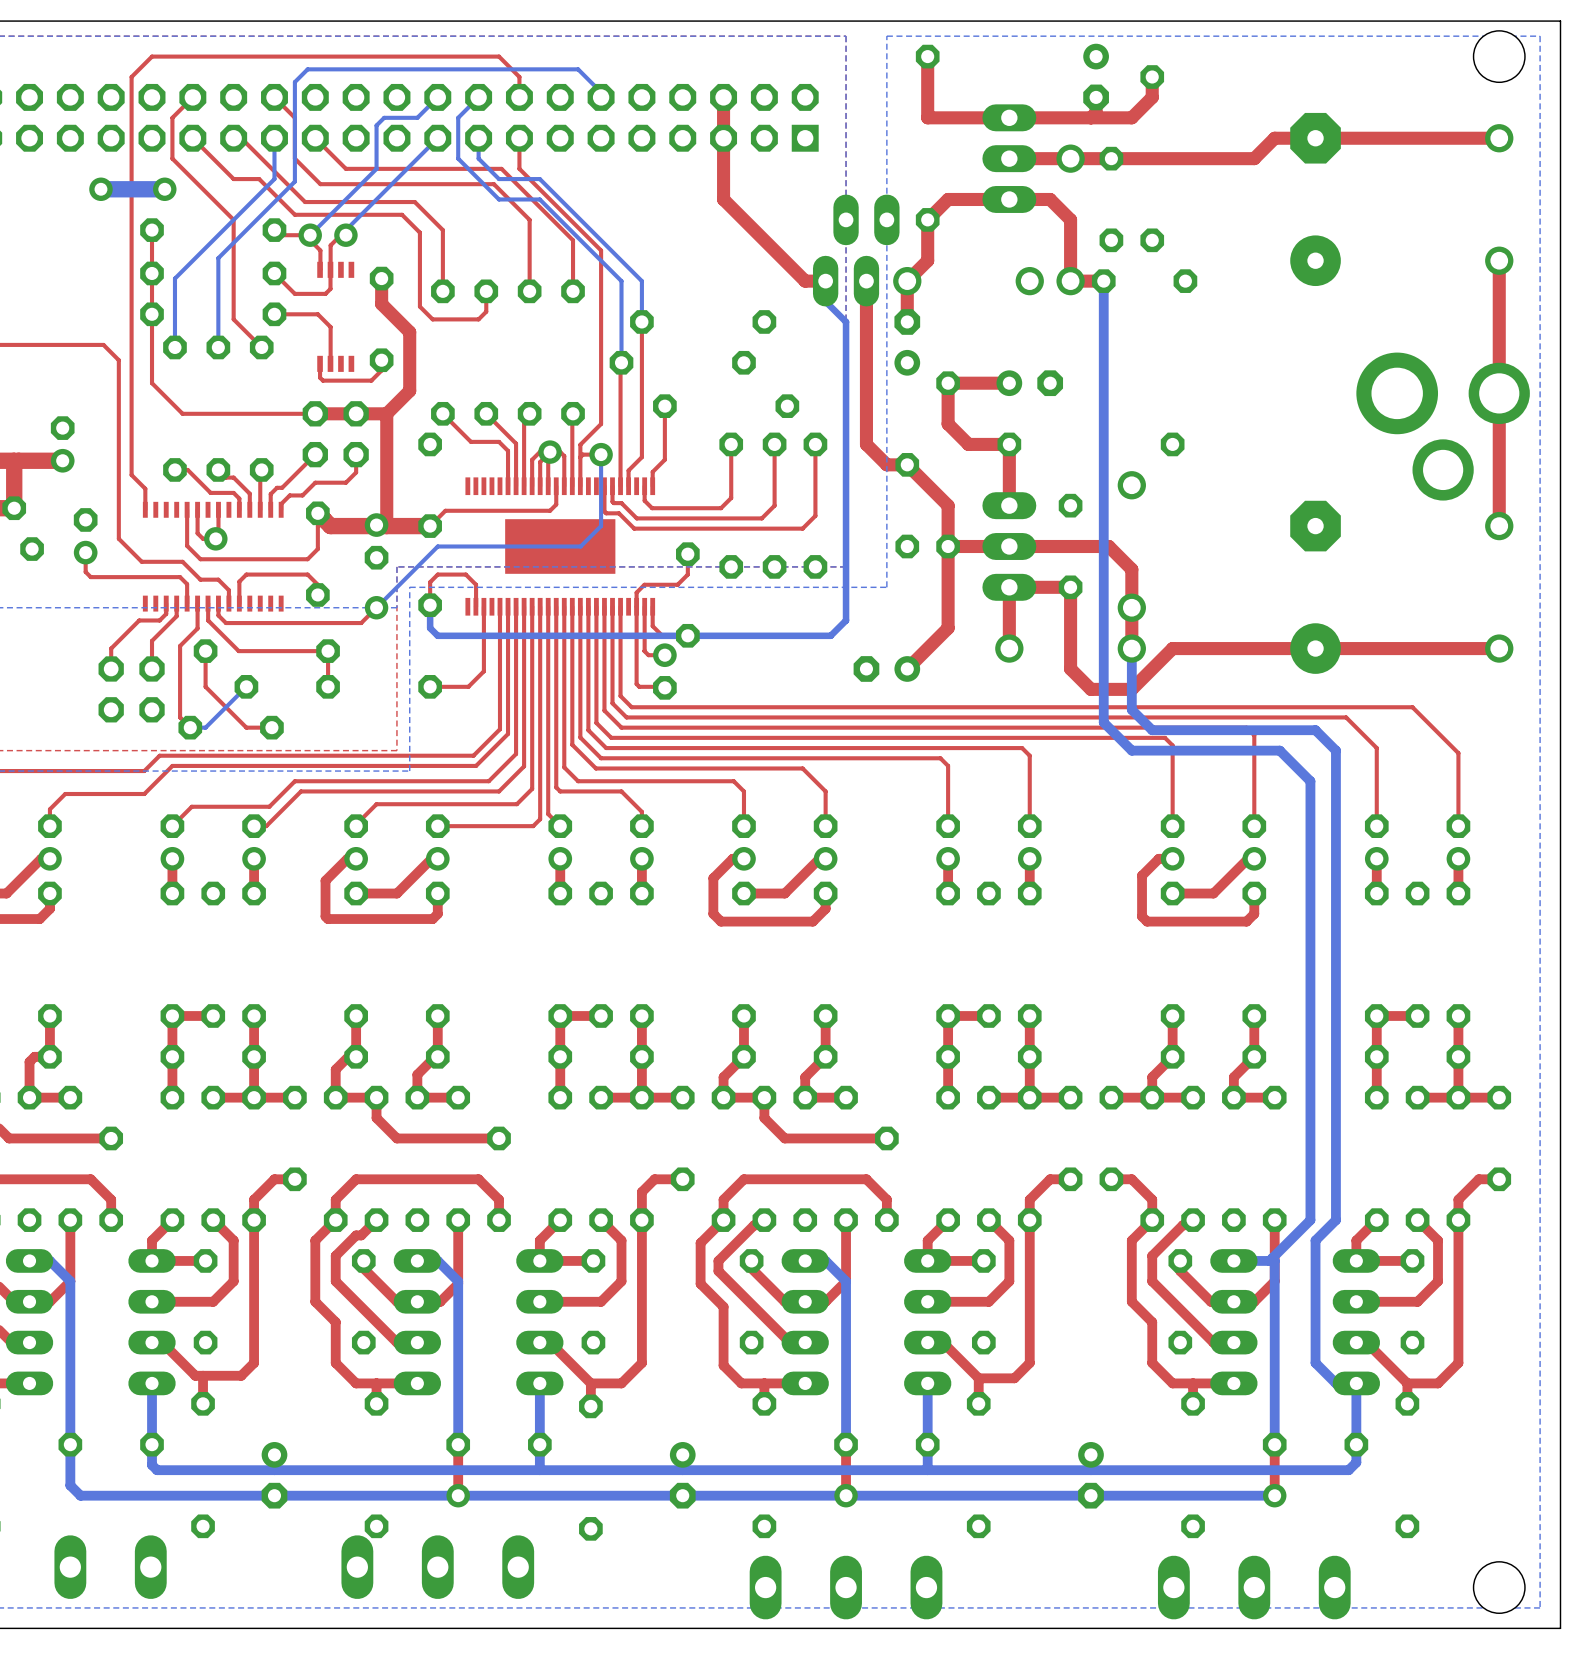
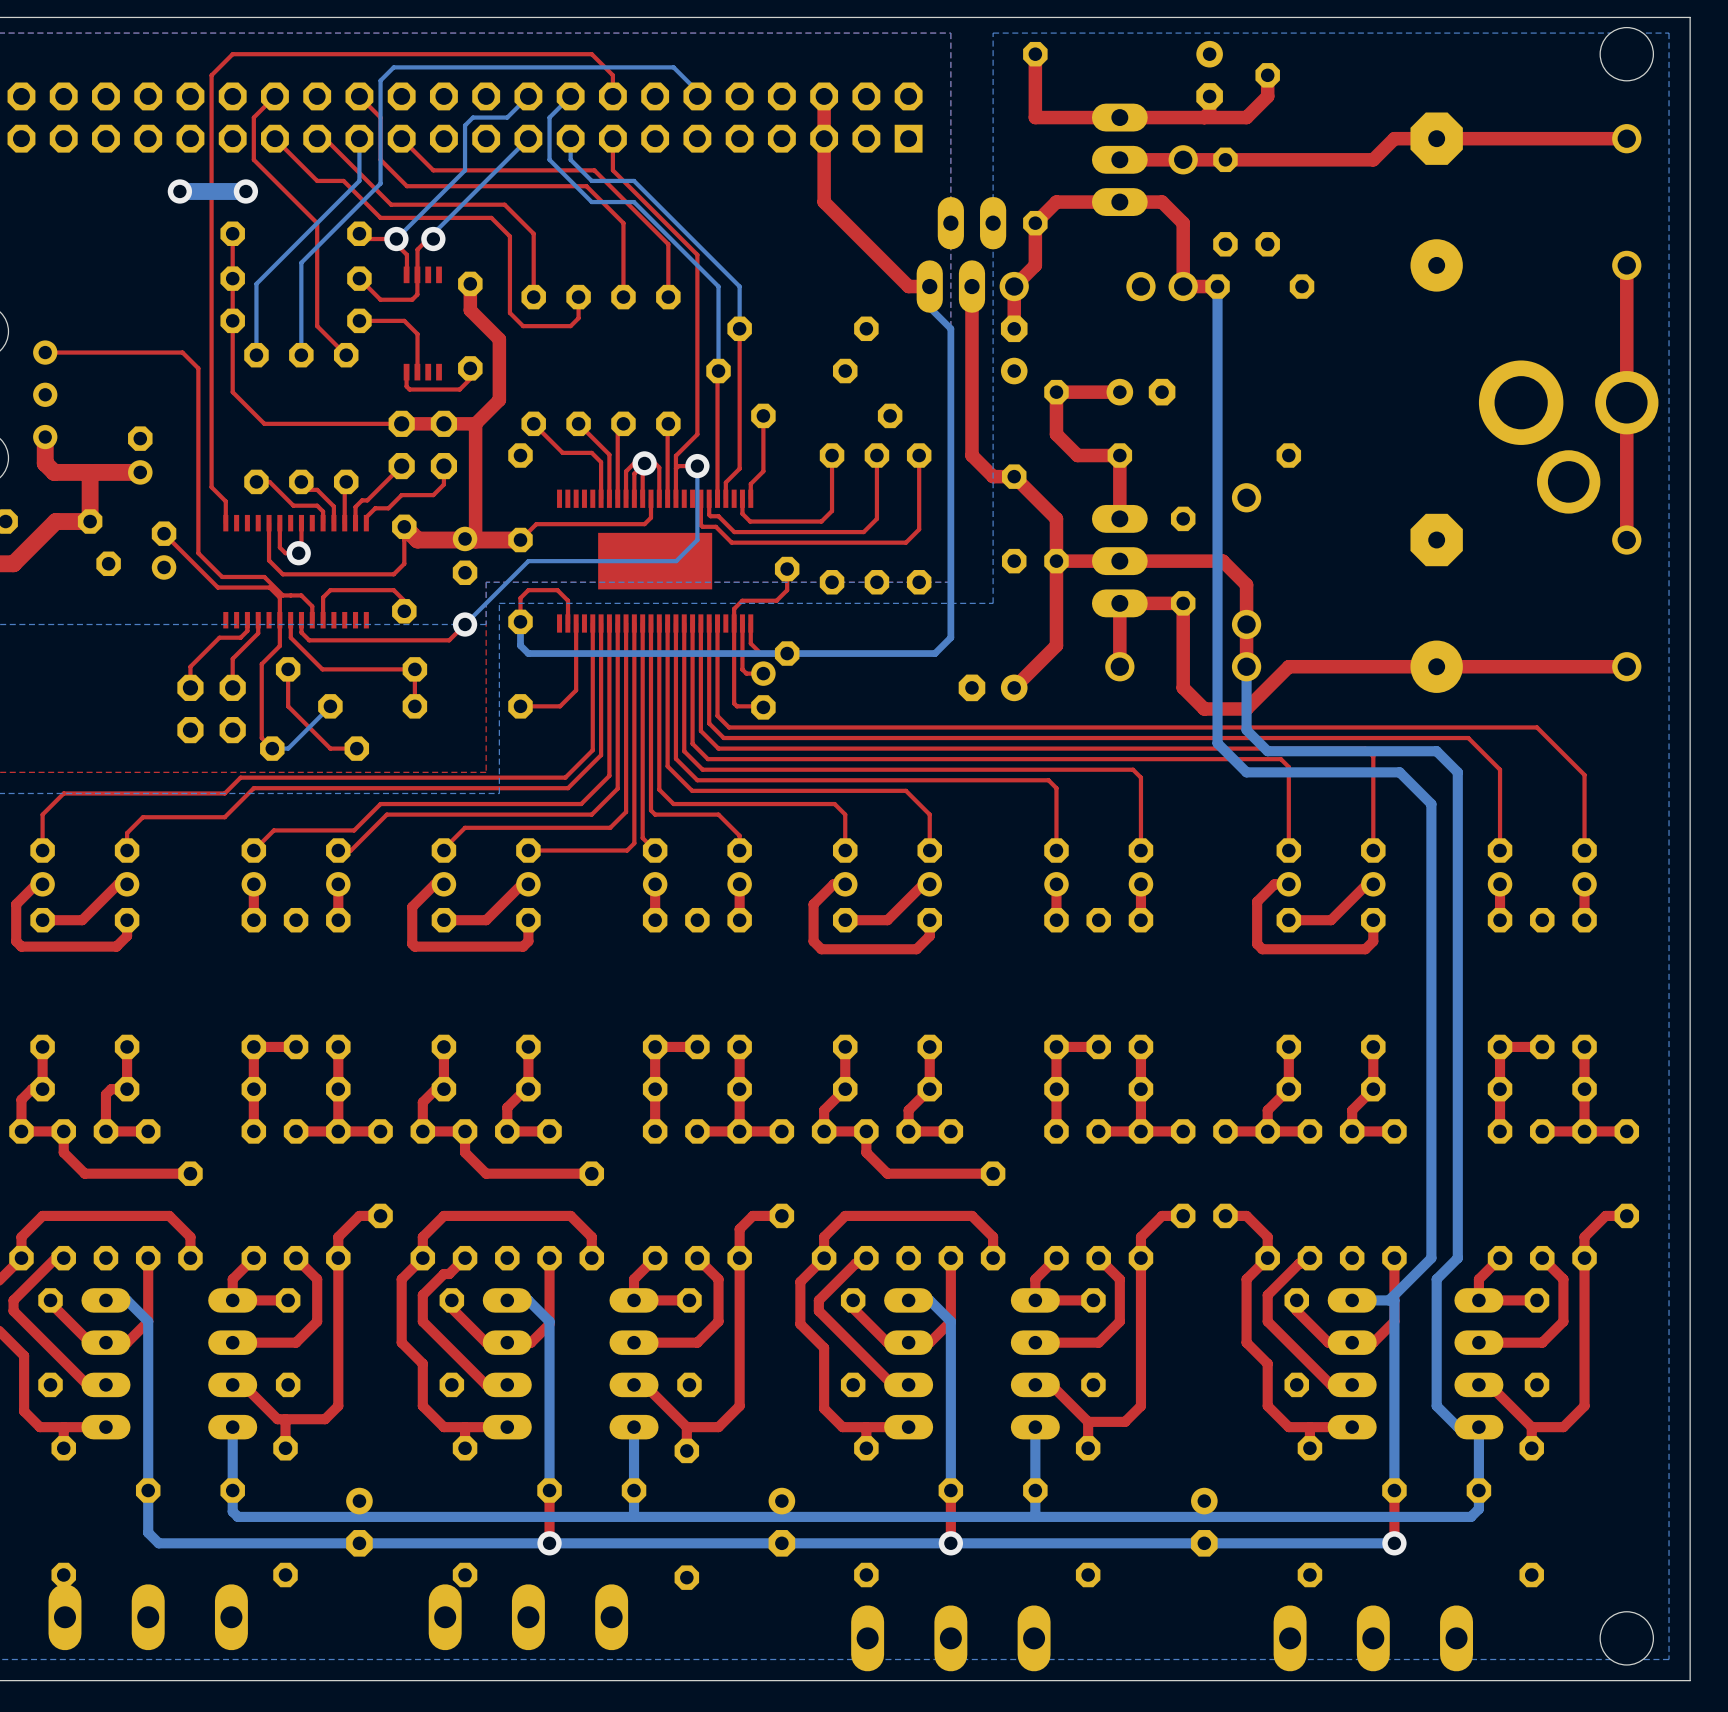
top track: none -> (164, 533) (217, 587) (269, 587) (279, 597) (279, 620)
top track: (85, 552) (85, 572) (90, 577) (180, 577) (187, 584) (187, 603) -> none

